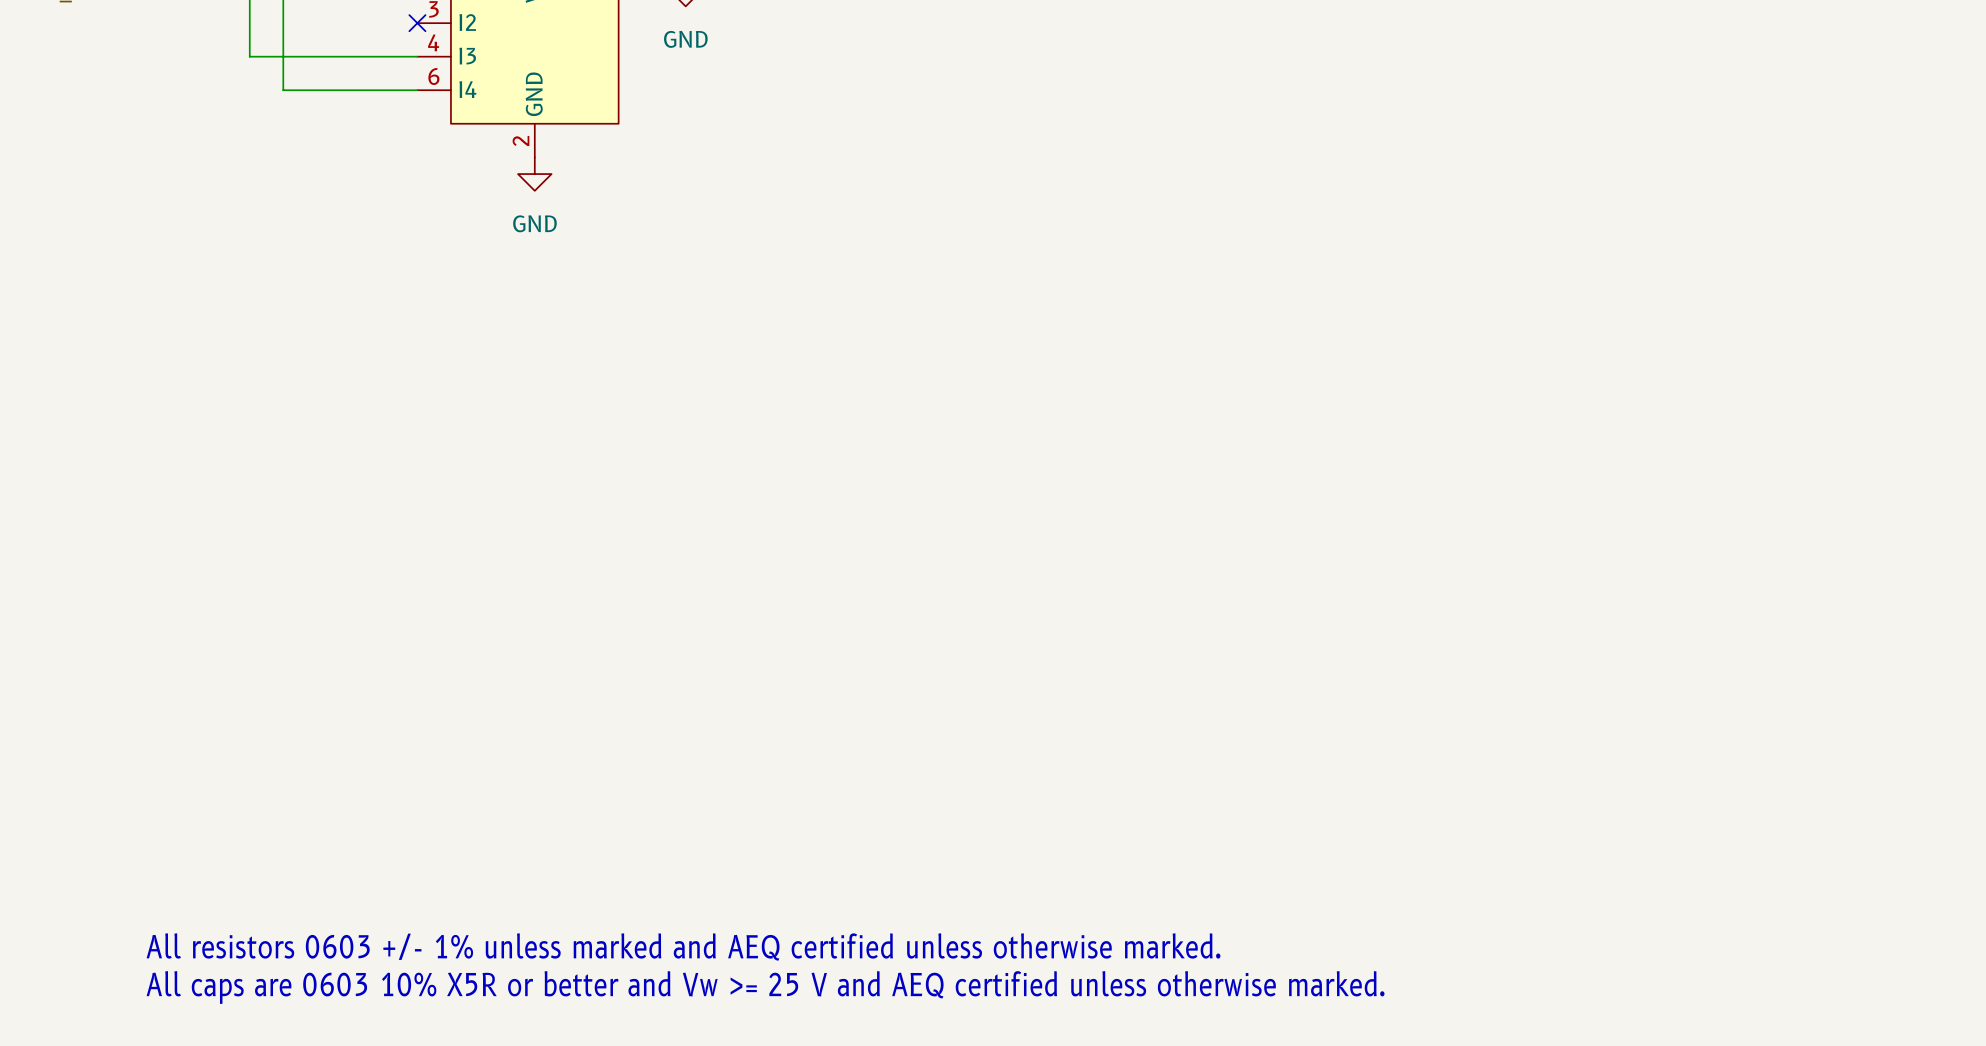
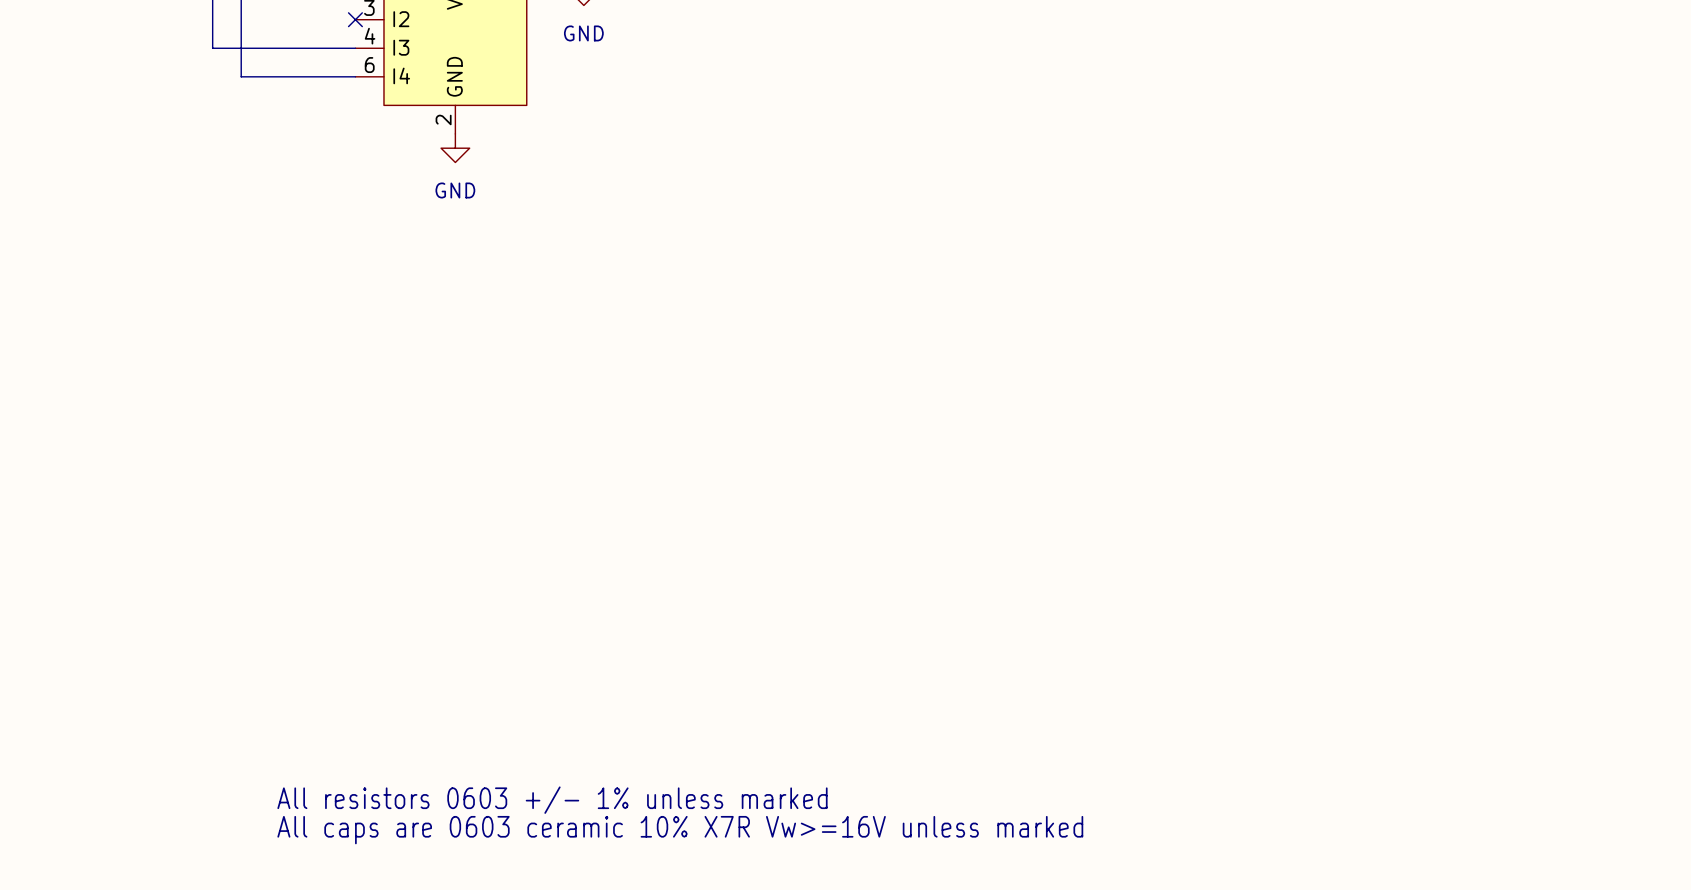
text: All resistors 0603 +/- 1% unless marked and AEQ certified unless otherwise marked. (683, 946) -> All resistors 0603 +/- 1% unless marked (552, 800)
text: none -> All caps are 0603 ceramic 10% X7R Vw>=16V unless marked (680, 830)
text: All caps are 0603 10% X5R or better and Vw >= 25 V and AEQ certified unless otherwise marked. (765, 987) -> none

